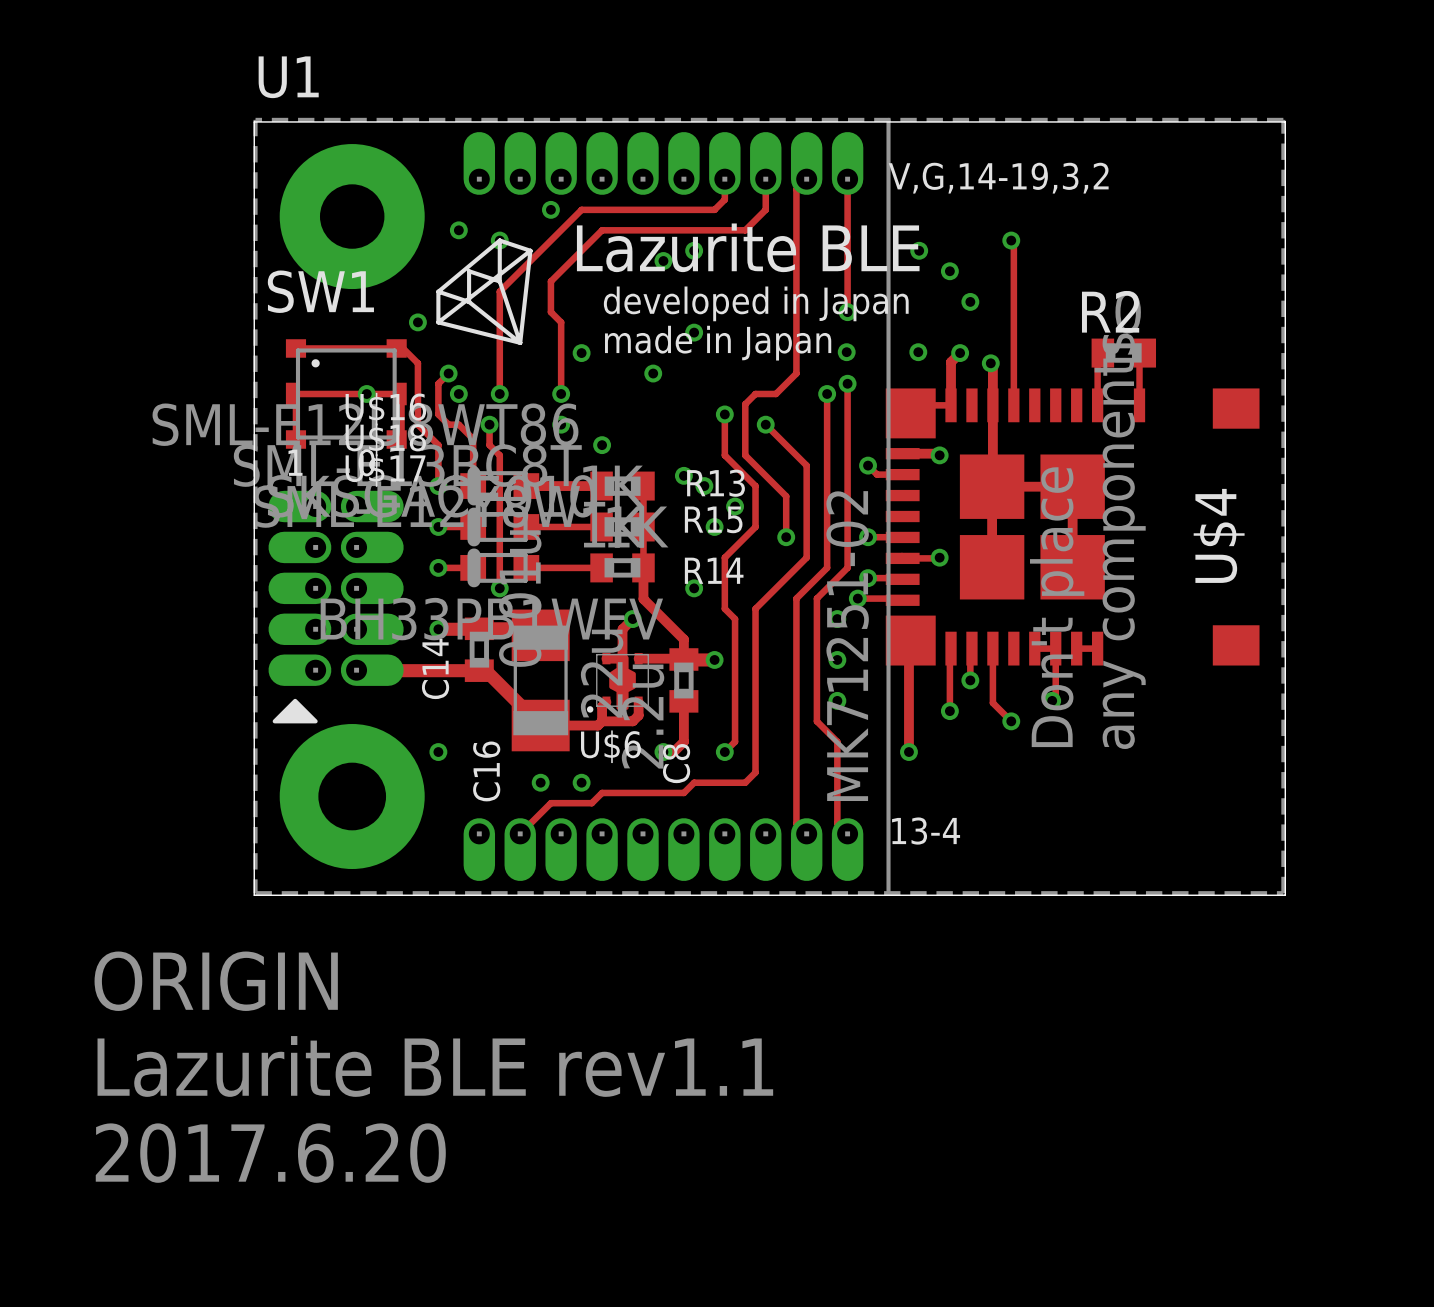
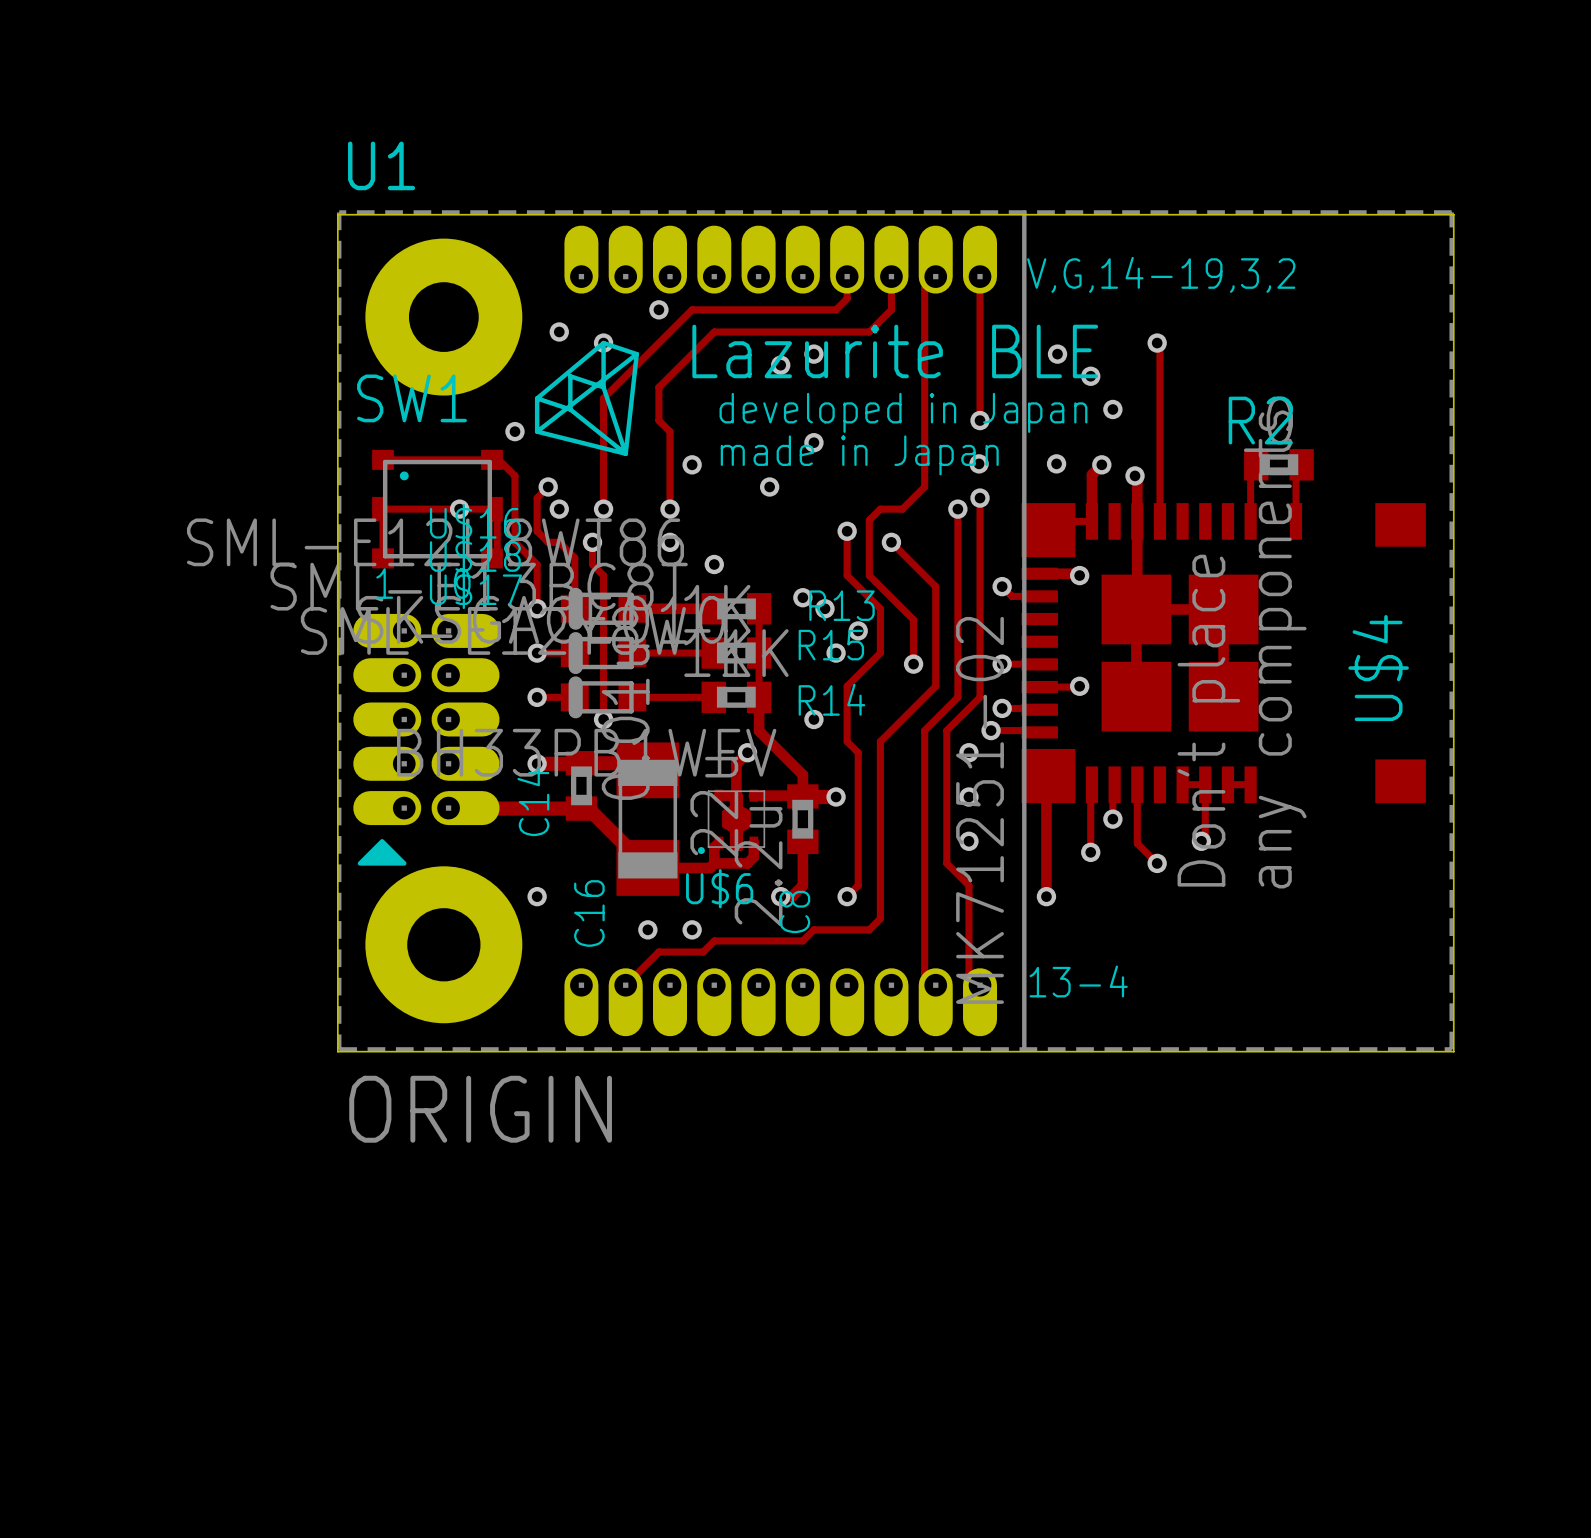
text position: ORIGIN (216, 981) -> ORIGIN (480, 1109)
text: Lazurite BLE rev1.1 (435, 1066) -> none
text: 2017.6.20 (270, 1153) -> none

